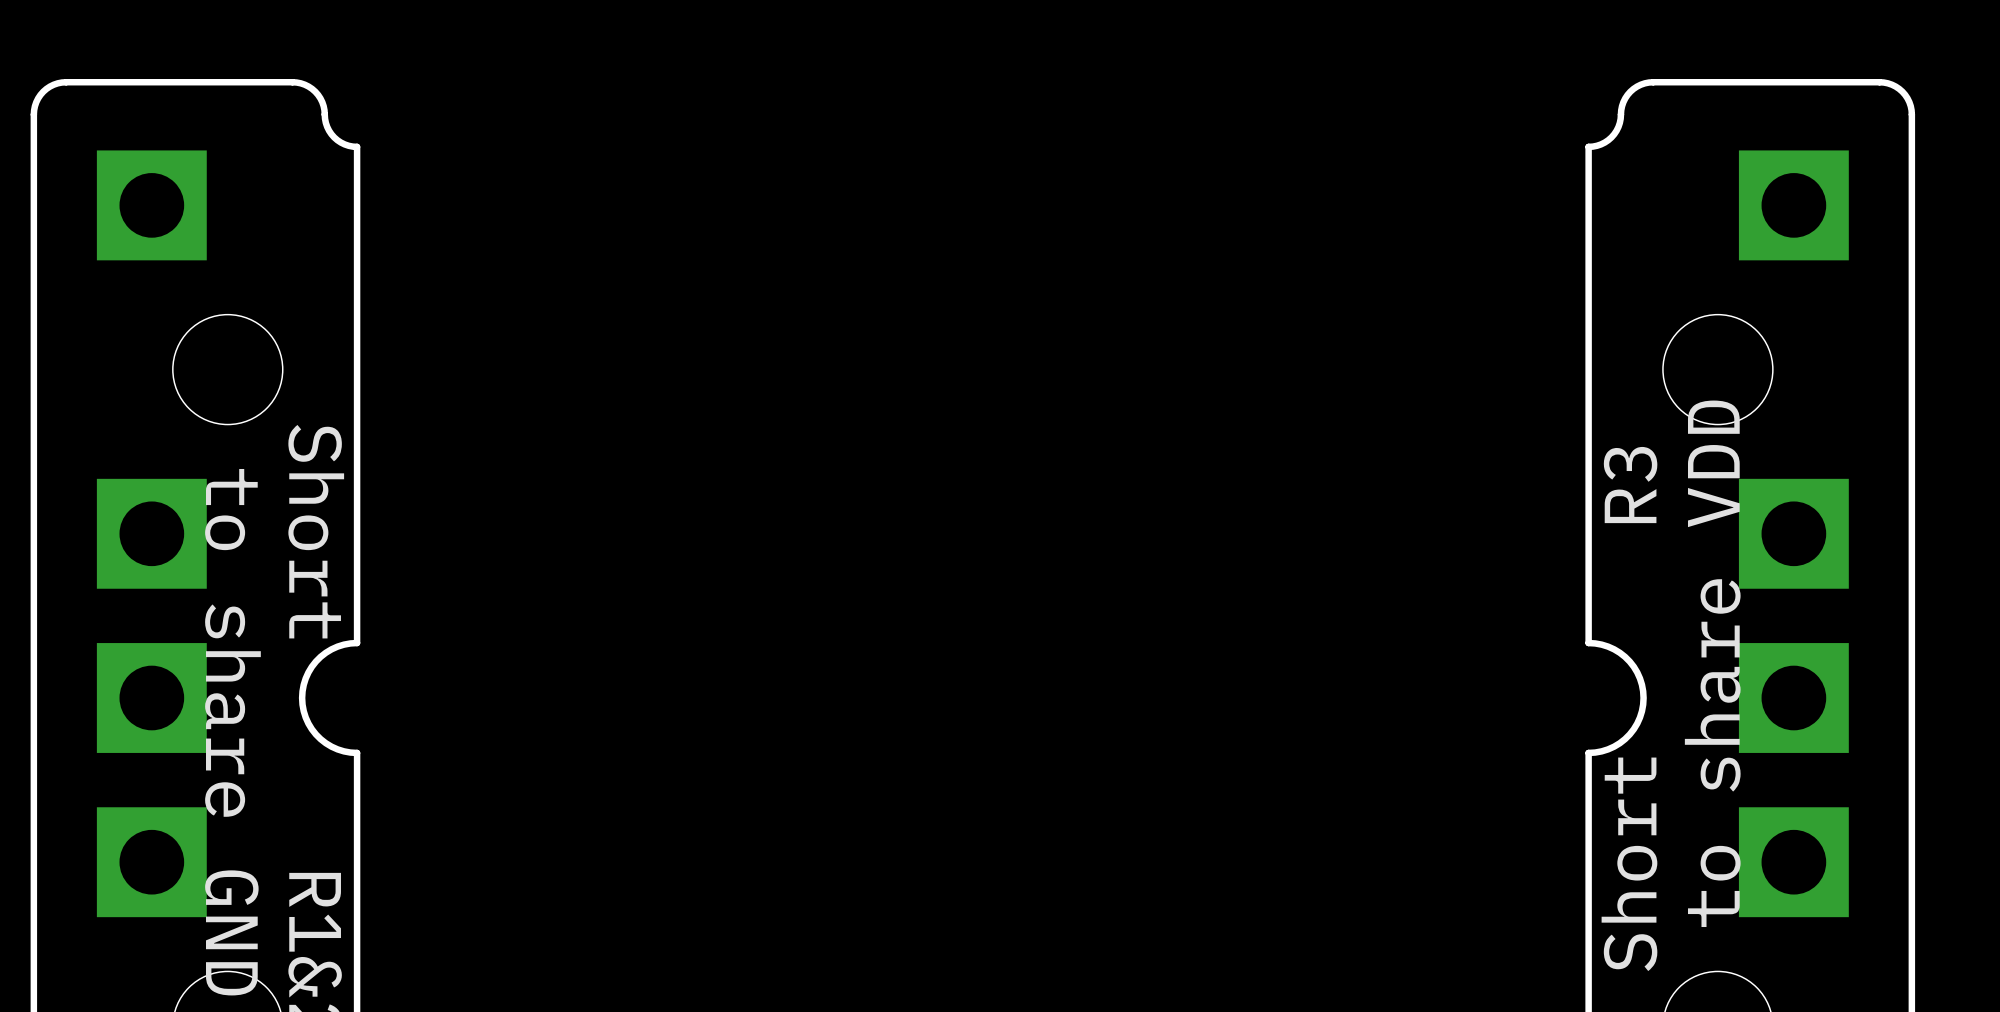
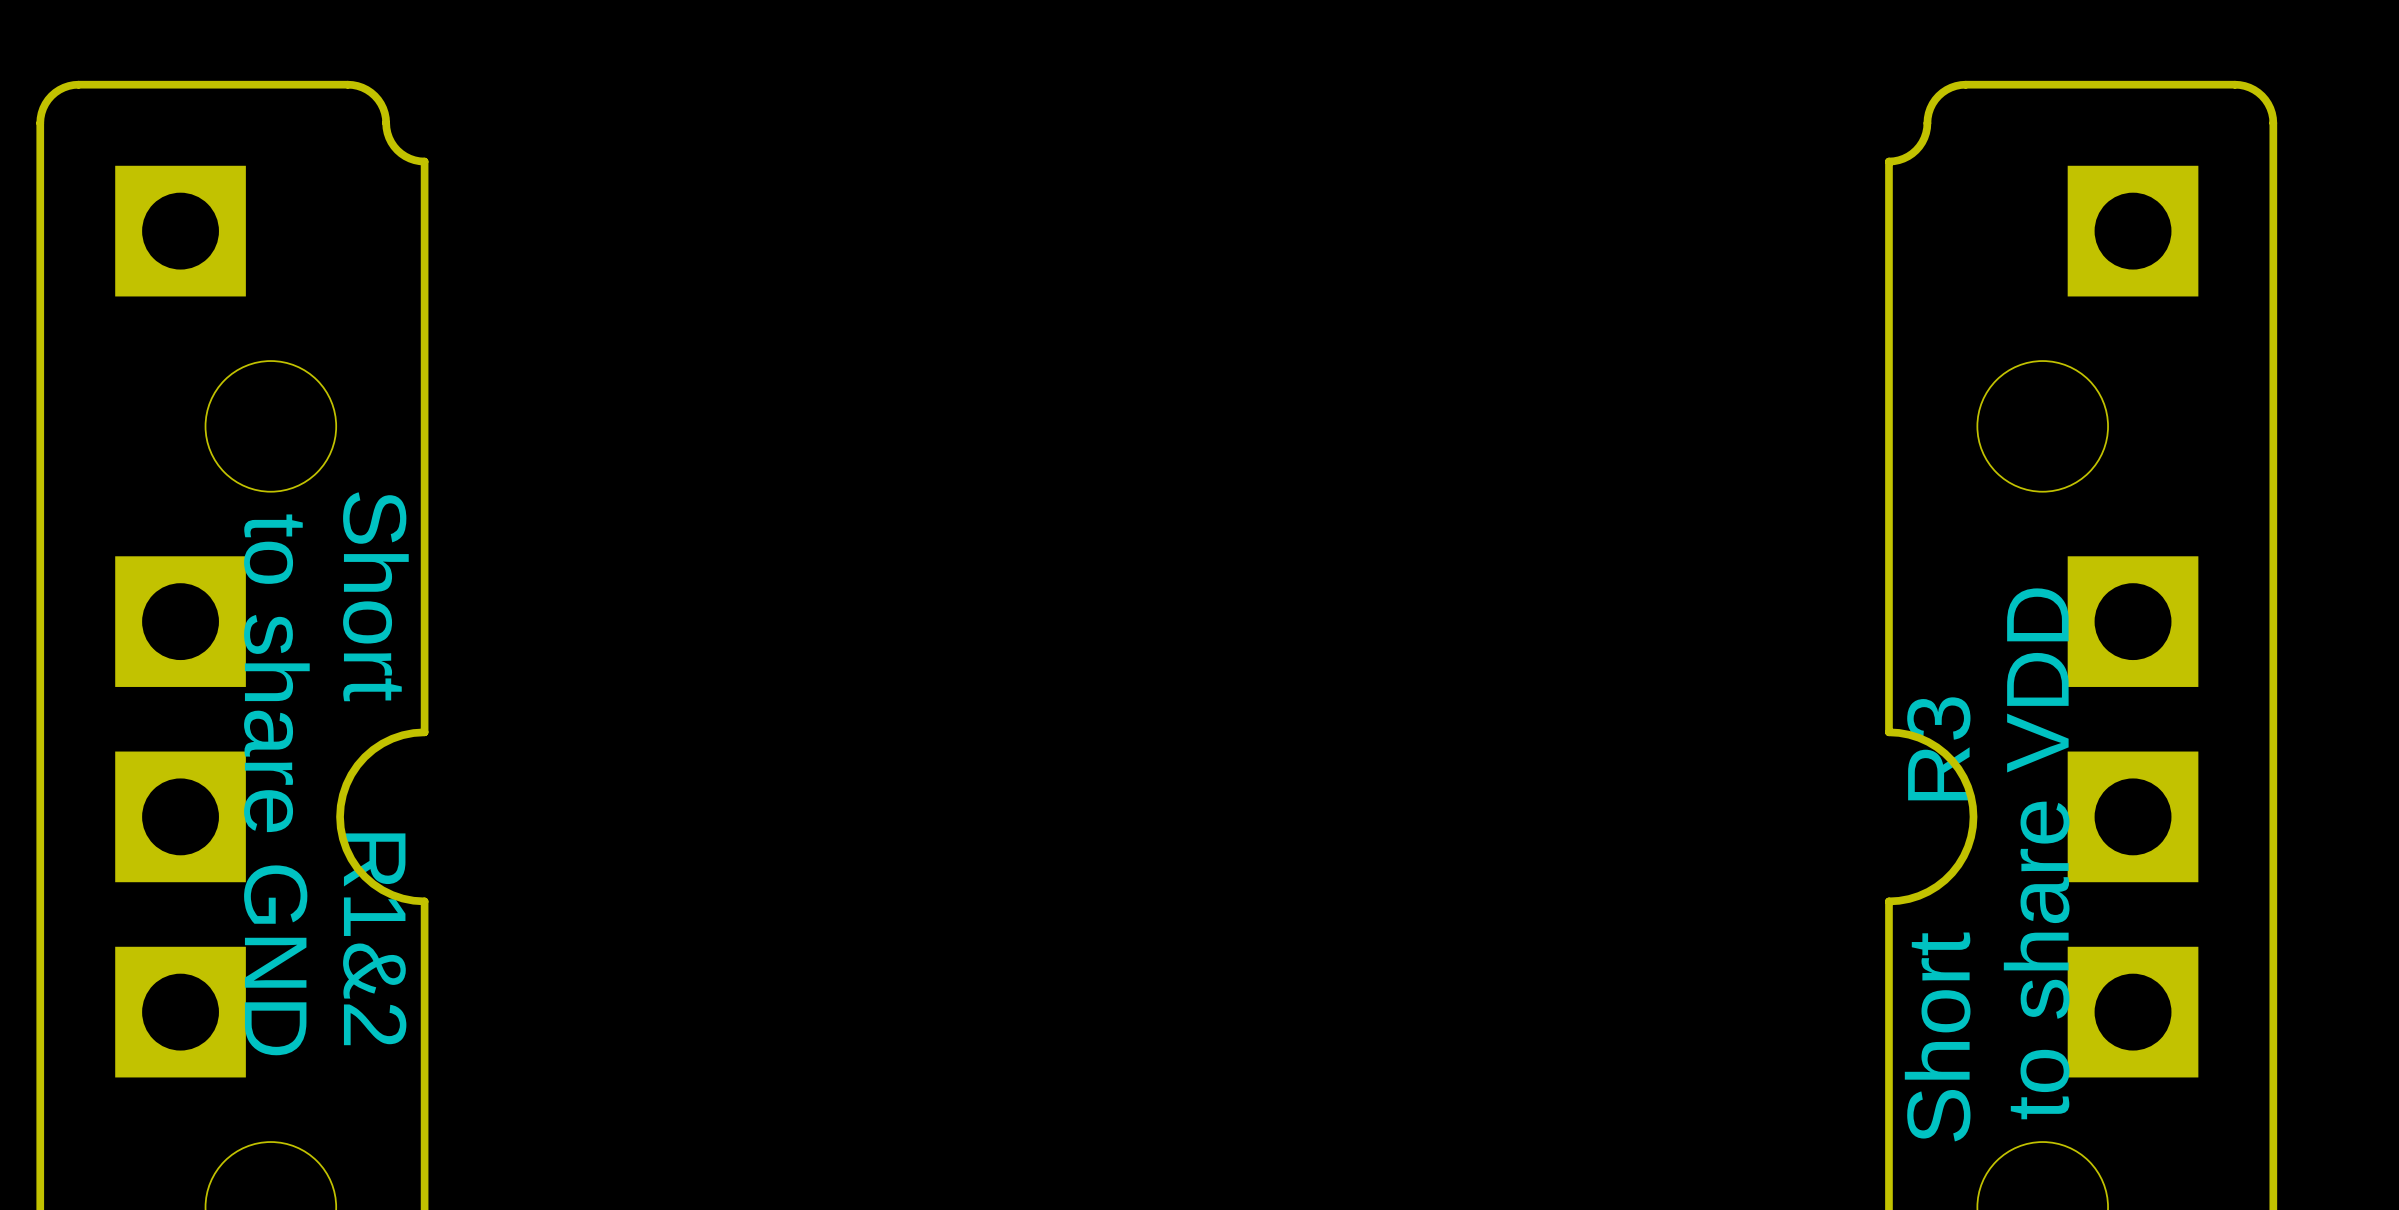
board edge: (357, 626) (357, 643) (343, 644) (331, 649) (320, 656) (311, 666) (303, 684) (302, 698) (303, 711) (311, 729) (320, 739) (331, 746) (343, 751) (357, 752) (357, 769) -> (424, 732) (392, 738) (364, 757) (346, 784) (340, 816) (346, 849) (364, 876) (392, 894) (424, 901)
board edge: (1588, 626) (1588, 643) (1601, 644) (1614, 649) (1625, 656) (1633, 666) (1641, 684) (1643, 698) (1641, 711) (1633, 729) (1625, 739) (1614, 746) (1601, 751) (1588, 752) (1588, 769) -> (1888, 732) (1909, 734) (1928, 742) (1952, 760) (1968, 786) (1973, 816) (1968, 846) (1952, 872) (1928, 891) (1909, 898) (1888, 901)

